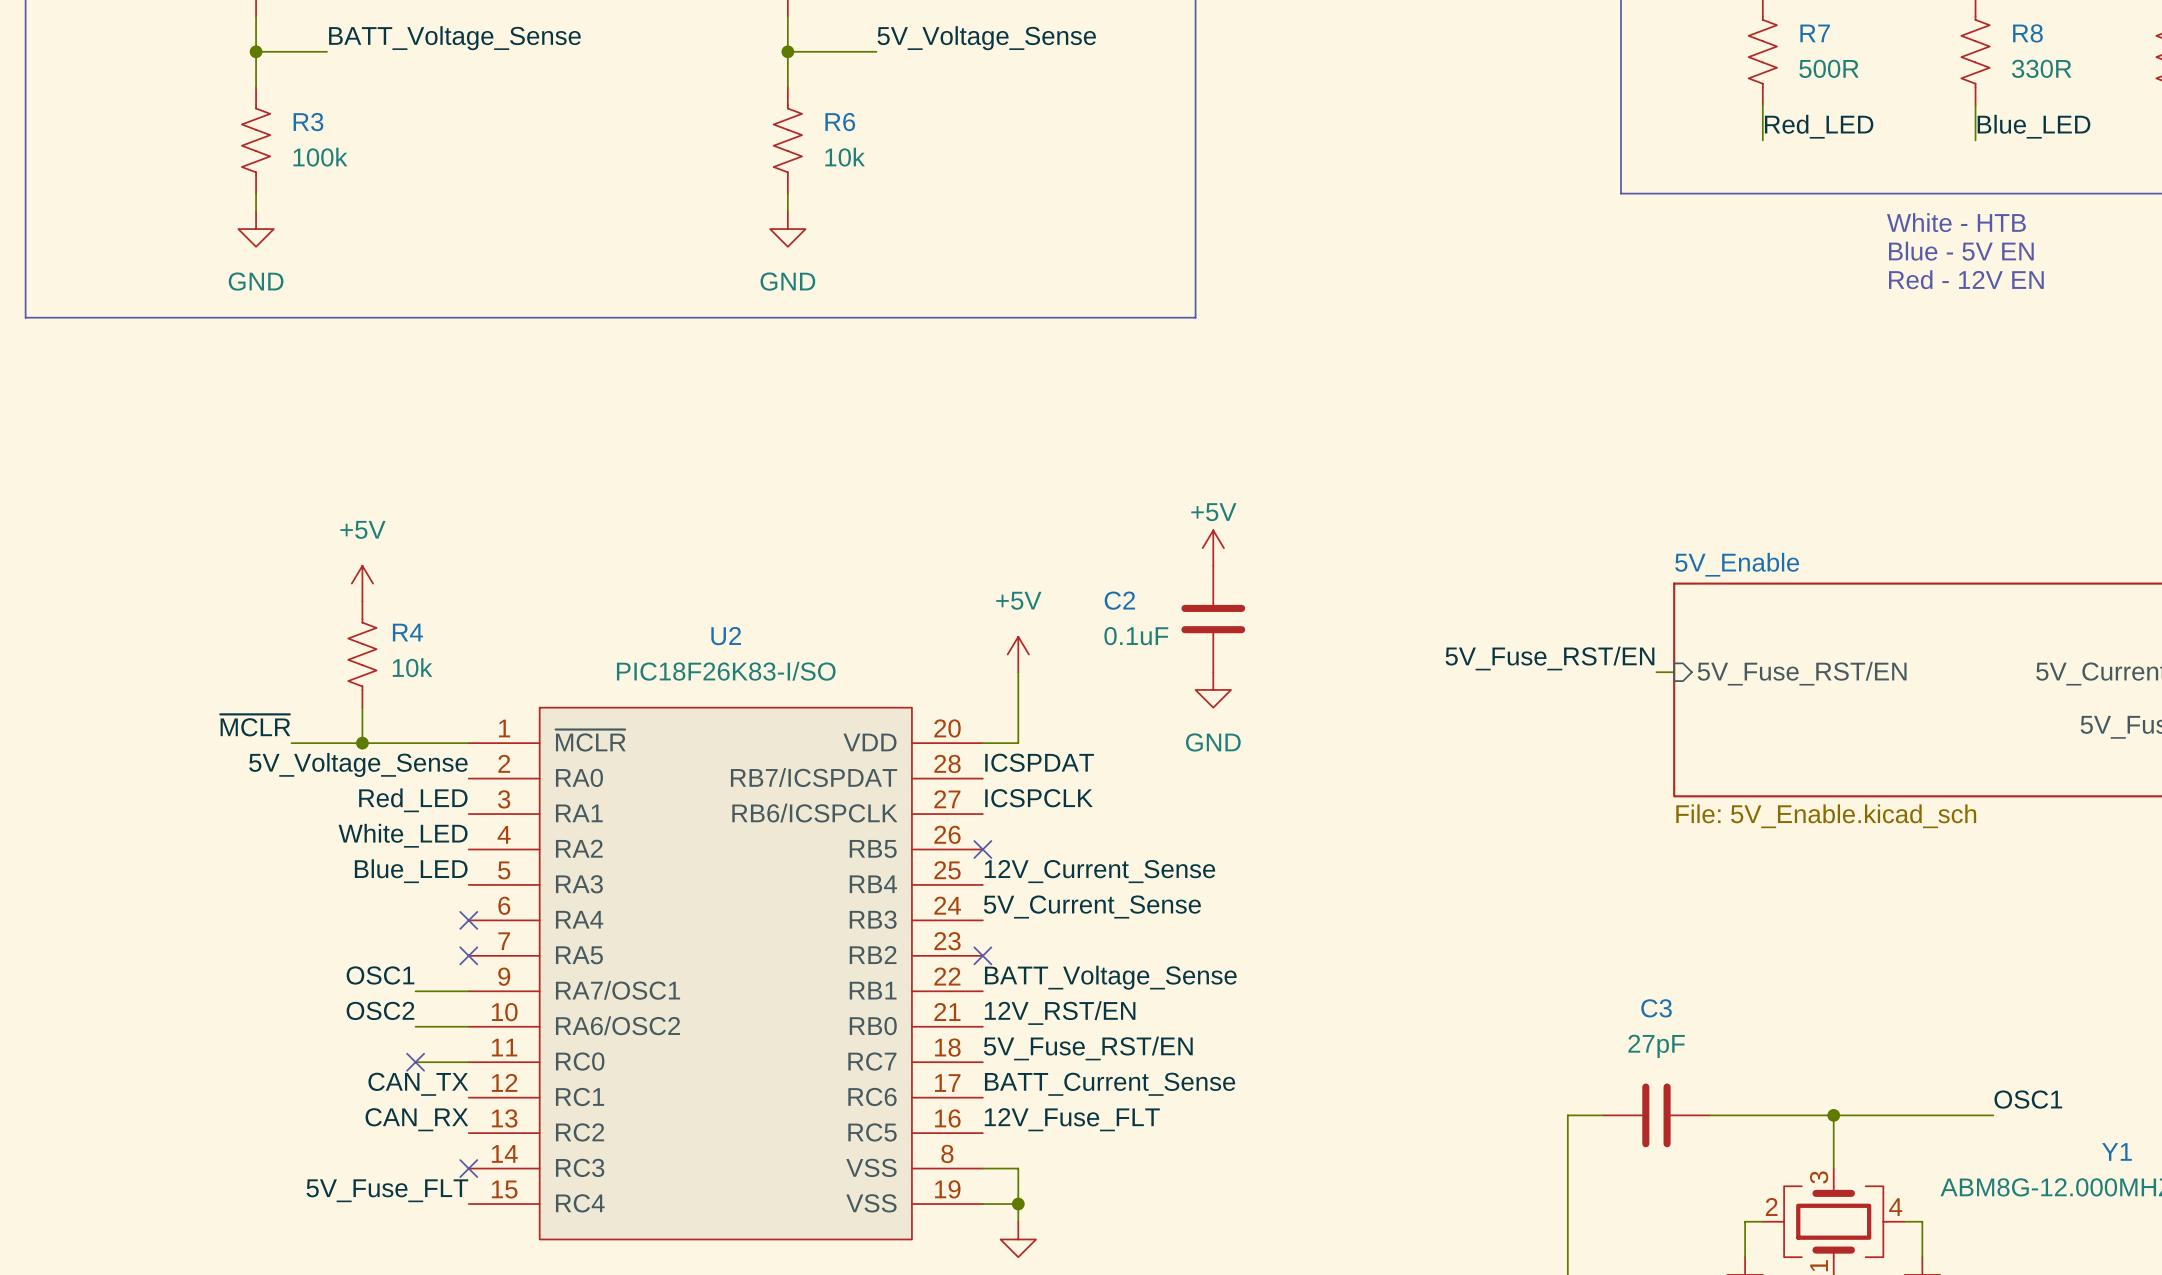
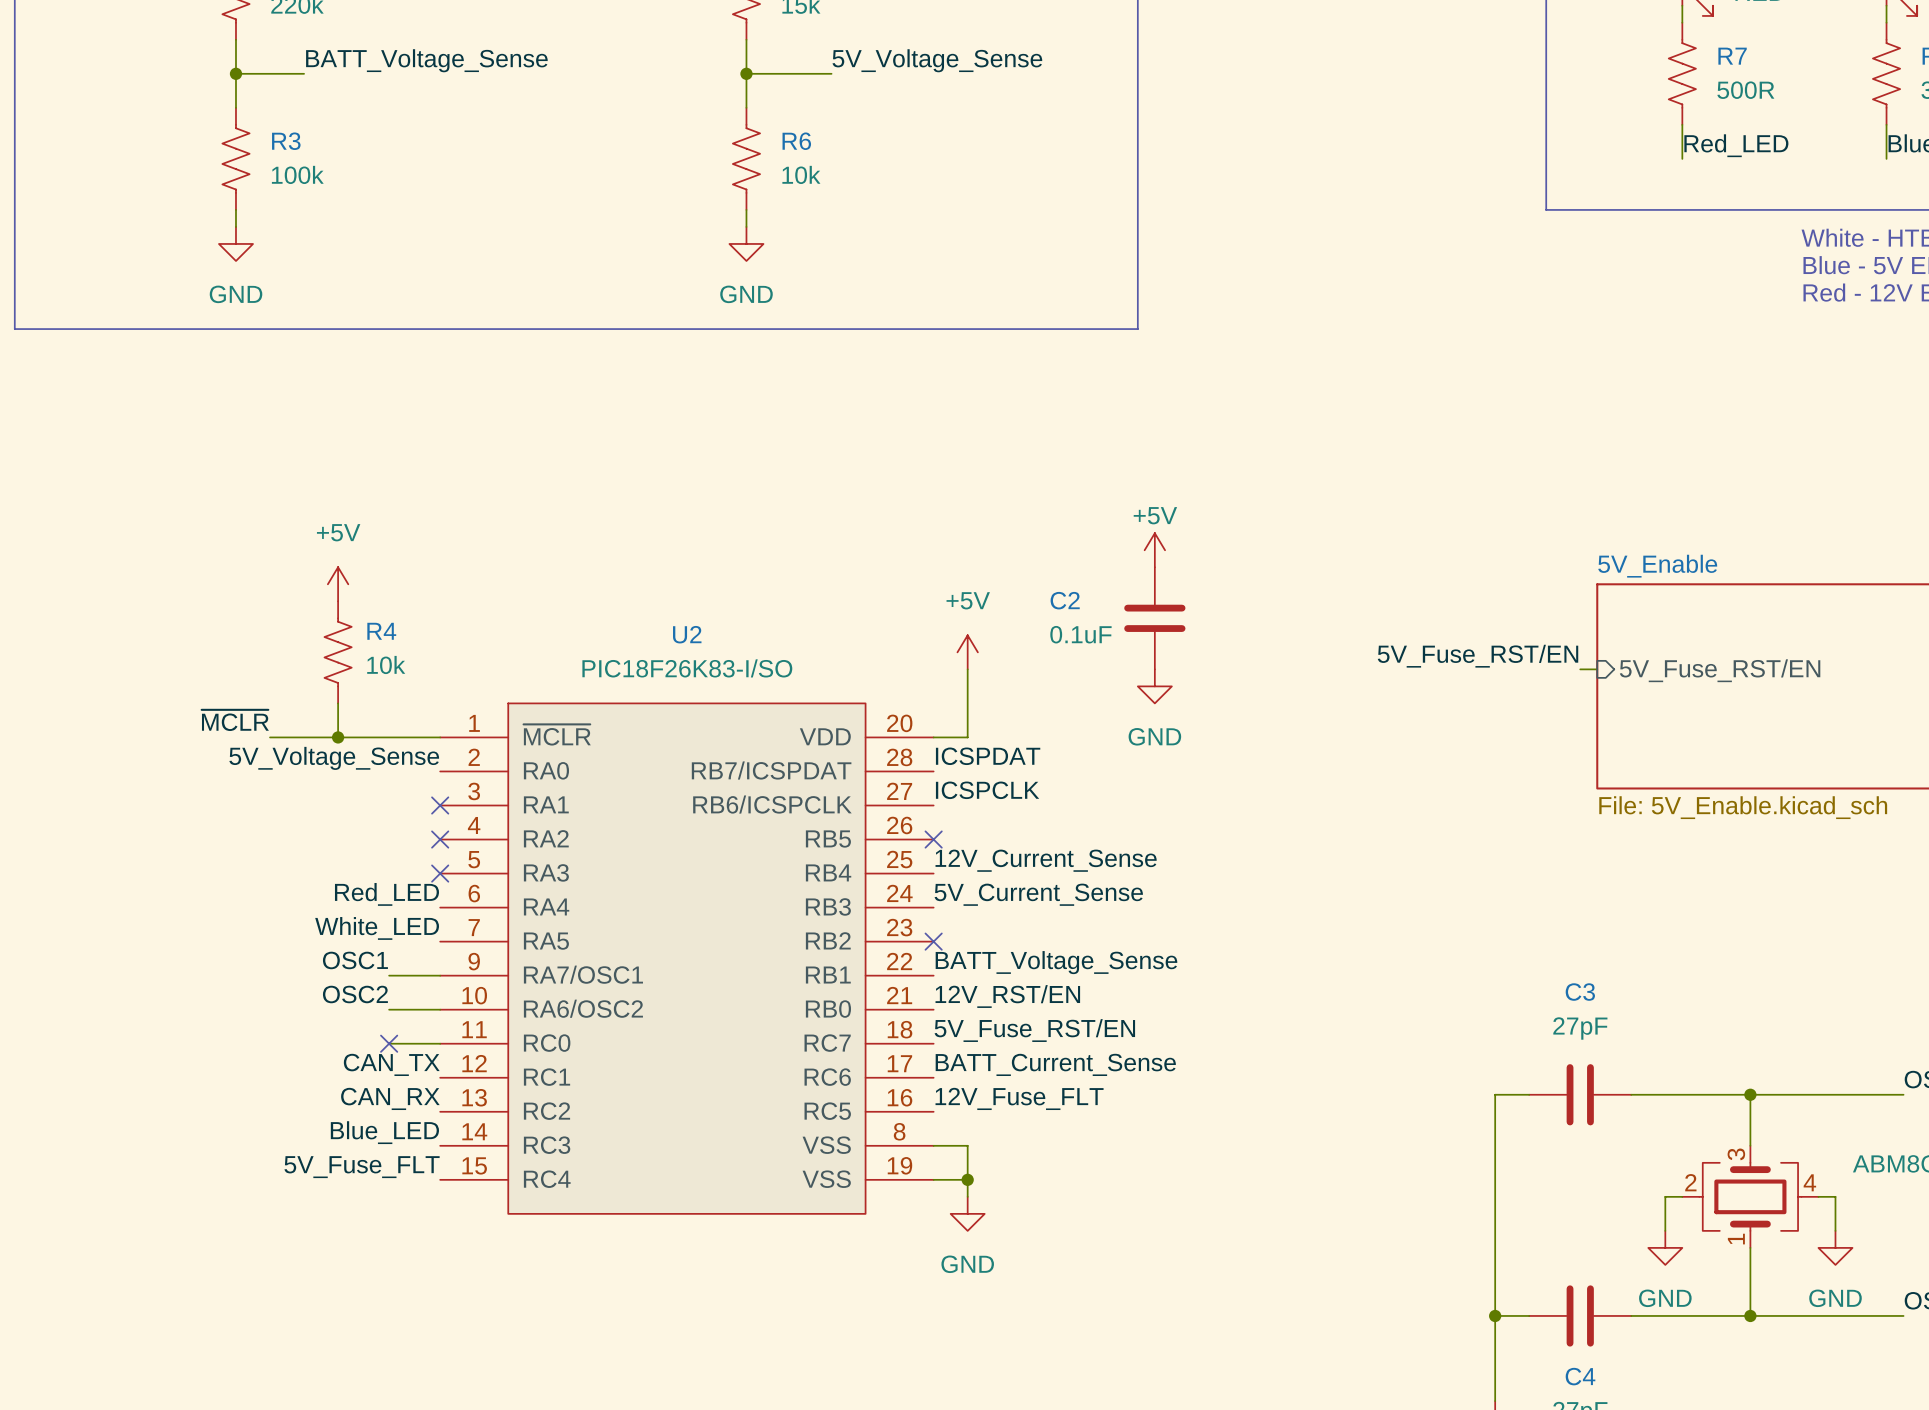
label position: Red_LED (413, 800) -> Red_LED (386, 894)
no-connect mark: none -> (440, 805)
label position: White_LED (403, 835) -> White_LED (377, 928)
no-connect mark: none -> (440, 839)
label position: Blue_LED (411, 871) -> Blue_LED (384, 1132)
no-connect mark: none -> (440, 873)
no-connect mark: (468, 920) -> none
no-connect mark: (468, 955) -> none
no-connect mark: (468, 1168) -> none

